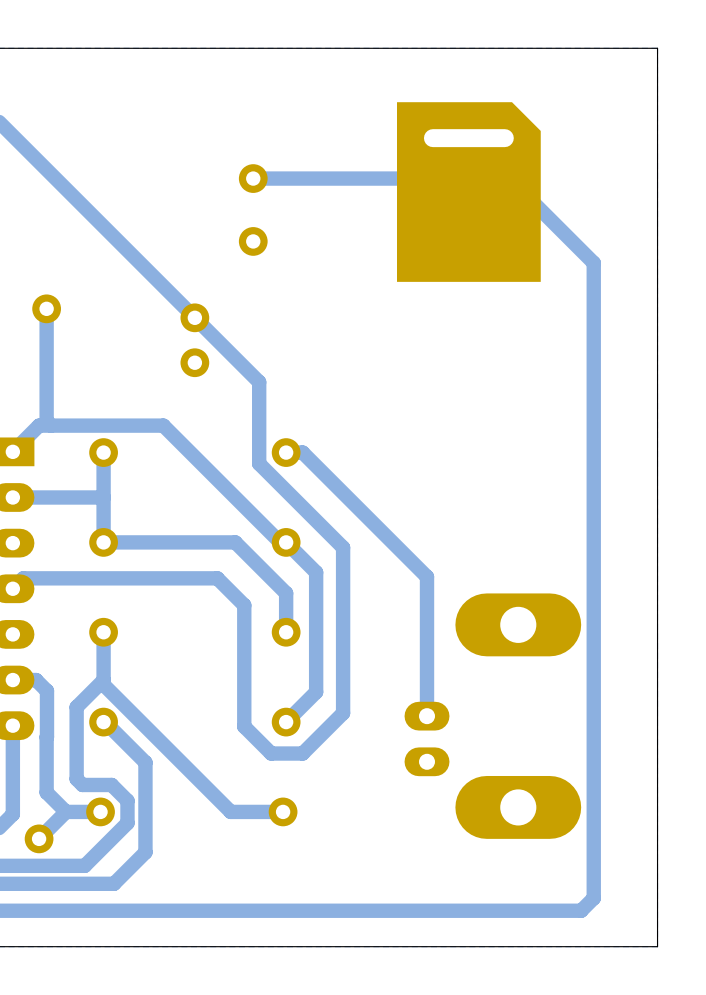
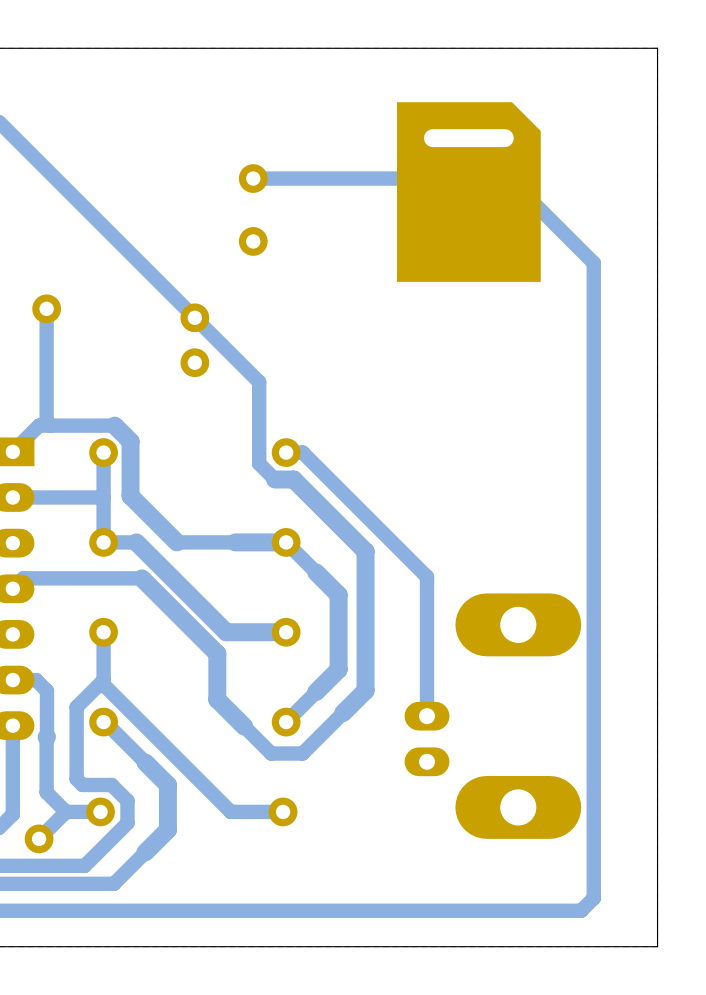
bottom track: (114, 425) (163, 425) (280, 542) -> (114, 425) (130, 441) (130, 496) (176, 542)
bottom track: (274, 479) (343, 547) (343, 713) -> (274, 479) (293, 479) (365, 551) (365, 690) (343, 713)
bottom track: (176, 542) (136, 542) -> (286, 632) (226, 632) (136, 542)
bottom track: (235, 542) (286, 593) (286, 632) -> (235, 542) (280, 542)
bottom track: (316, 572) (316, 692) -> (316, 572) (338, 594) (338, 669) (316, 692)
bottom track: (141, 578) (217, 578) (244, 605) (244, 726) -> (141, 578) (217, 653) (217, 699) (244, 726)
bottom track: (145, 762) (145, 852) -> (145, 762) (167, 784) (167, 829) (145, 852)

